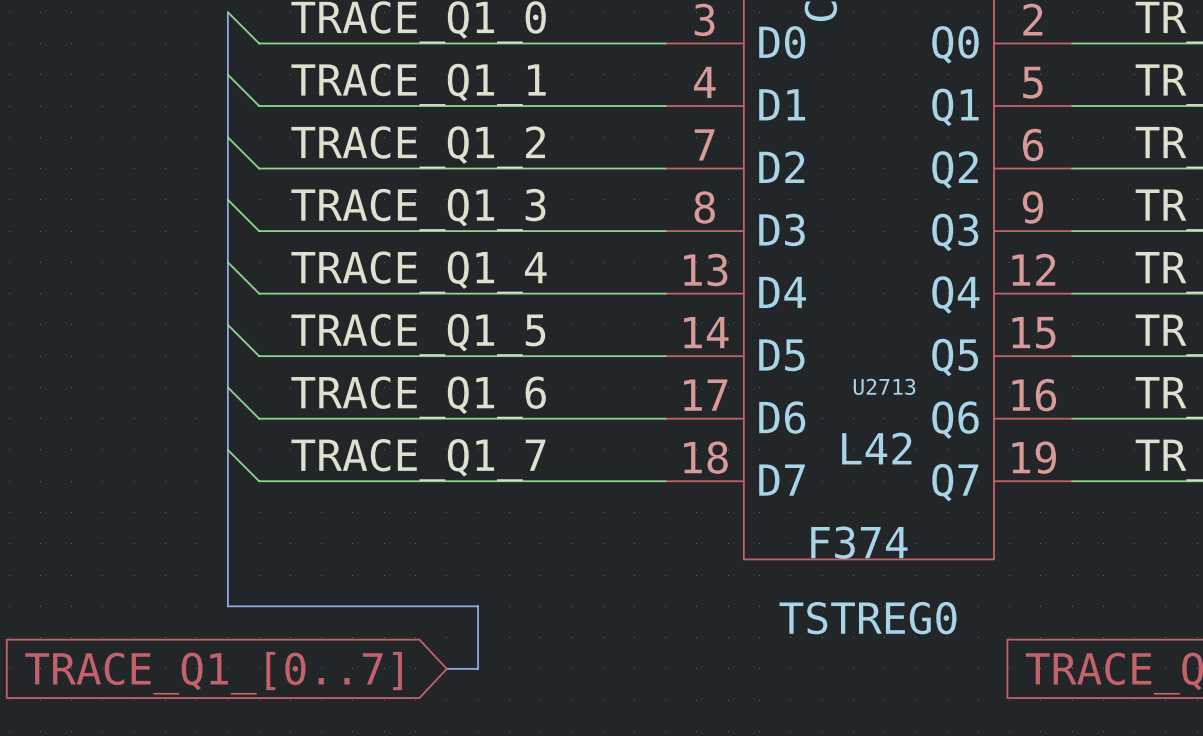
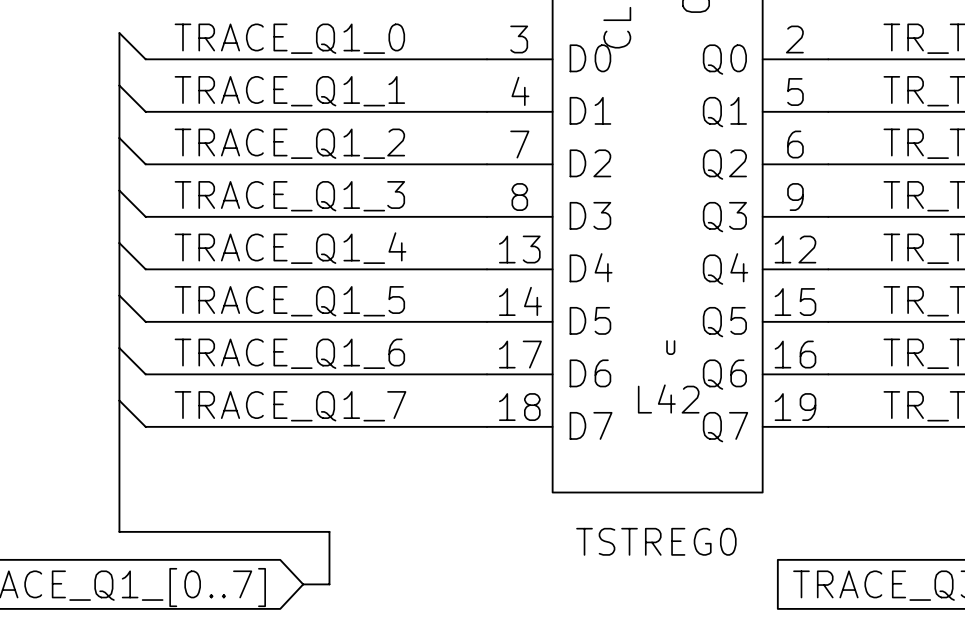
U2713 name: U2713 (884, 386) -> U (670, 347)
U2713 value: F374 (859, 542) -> none

